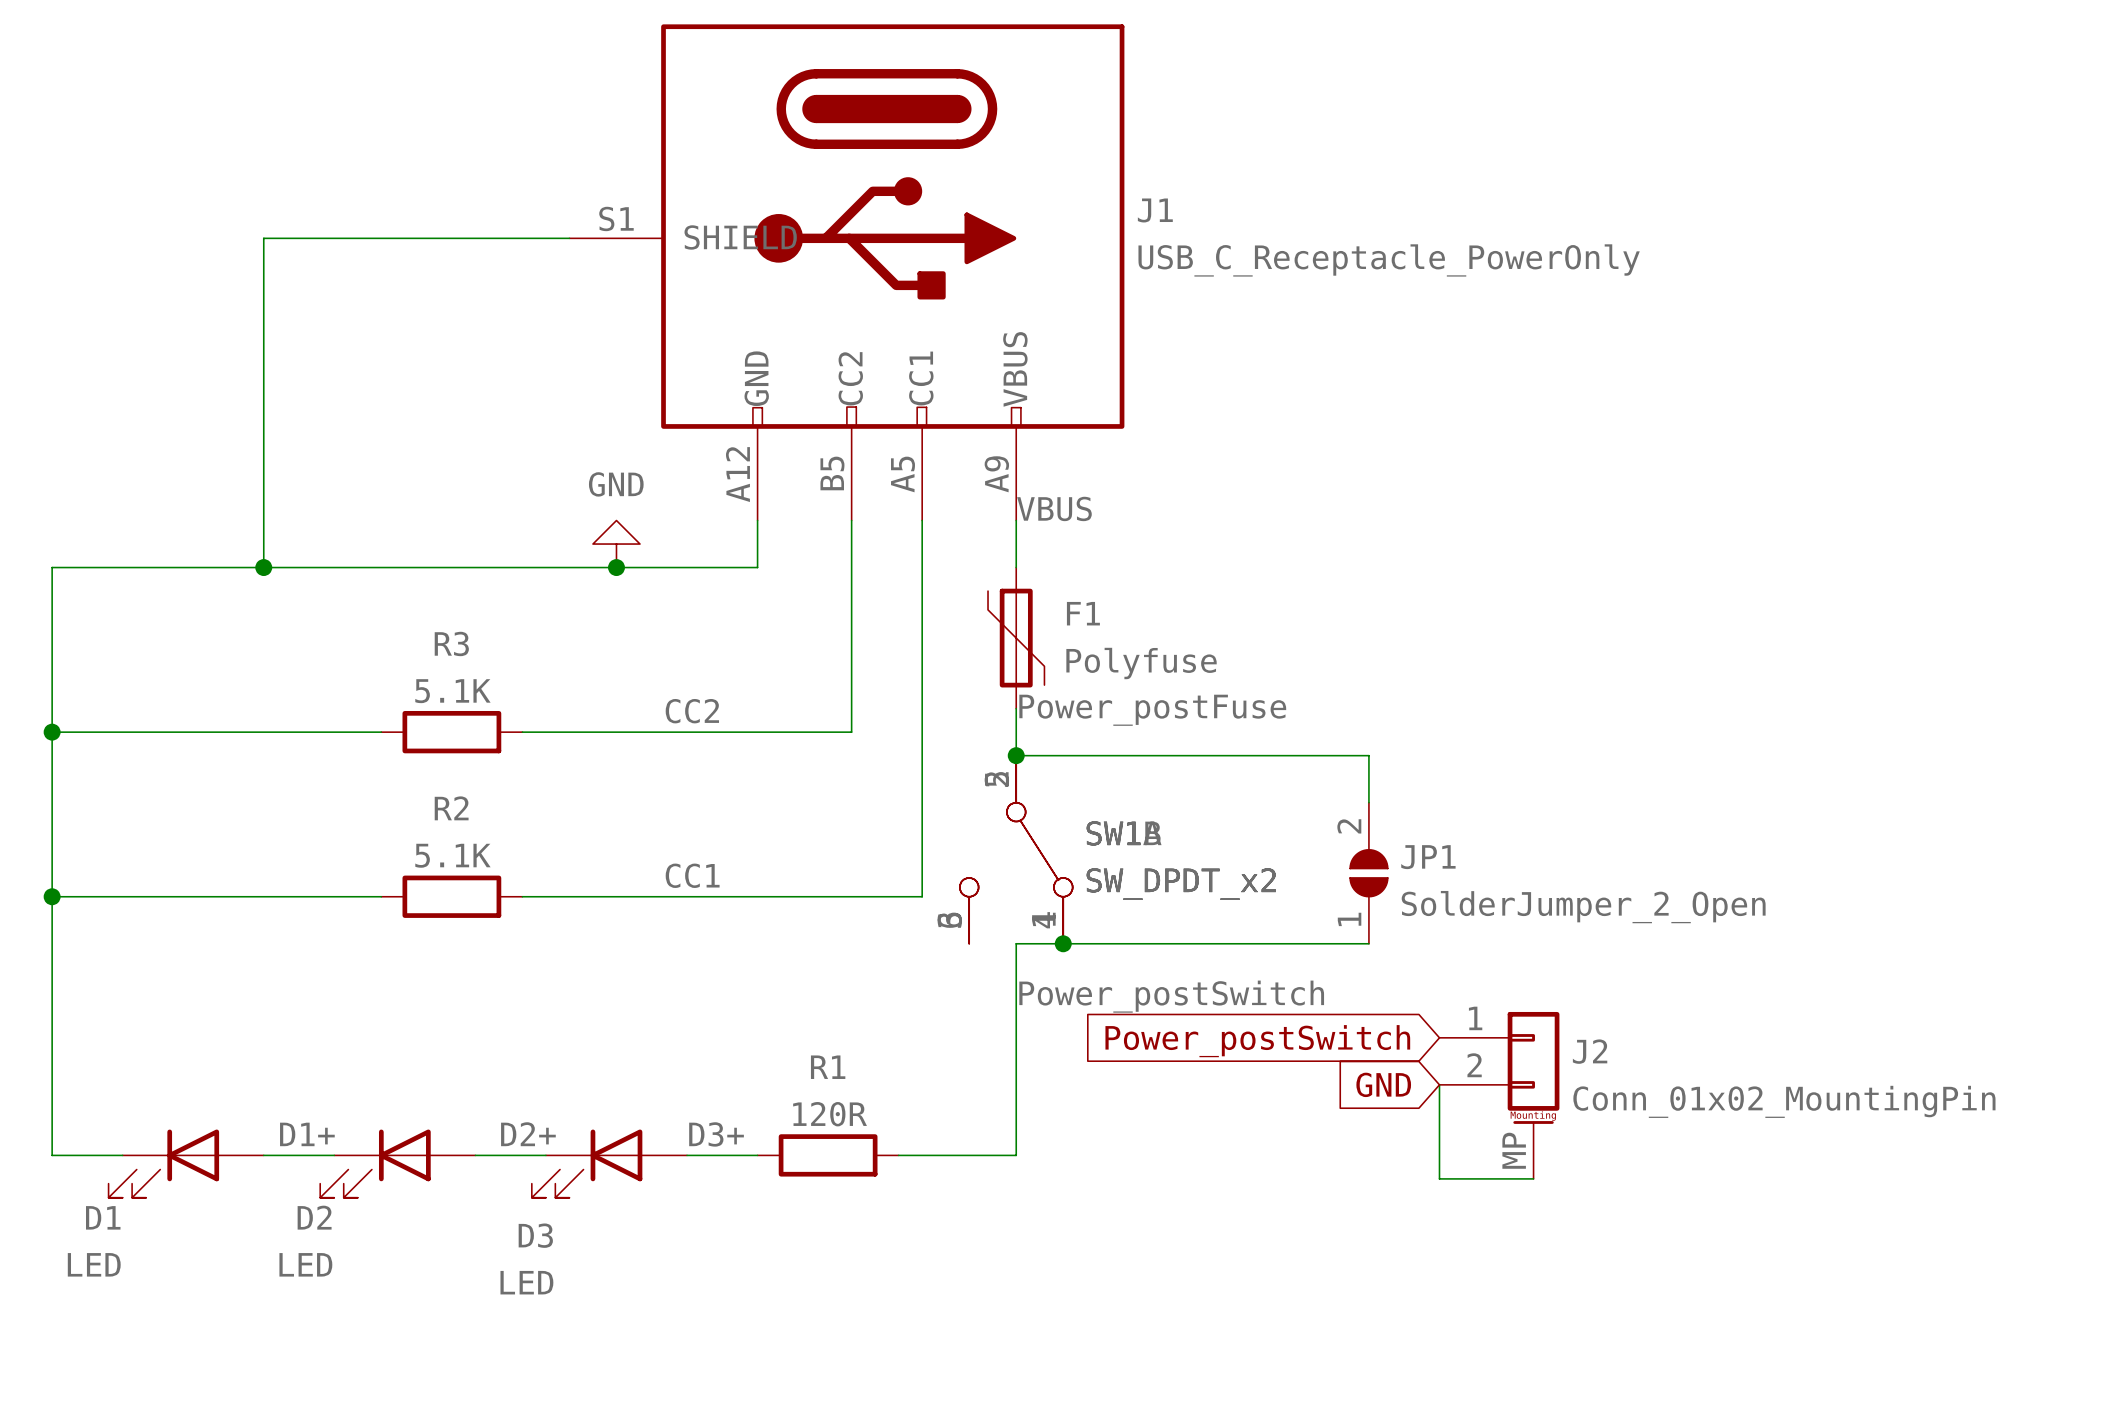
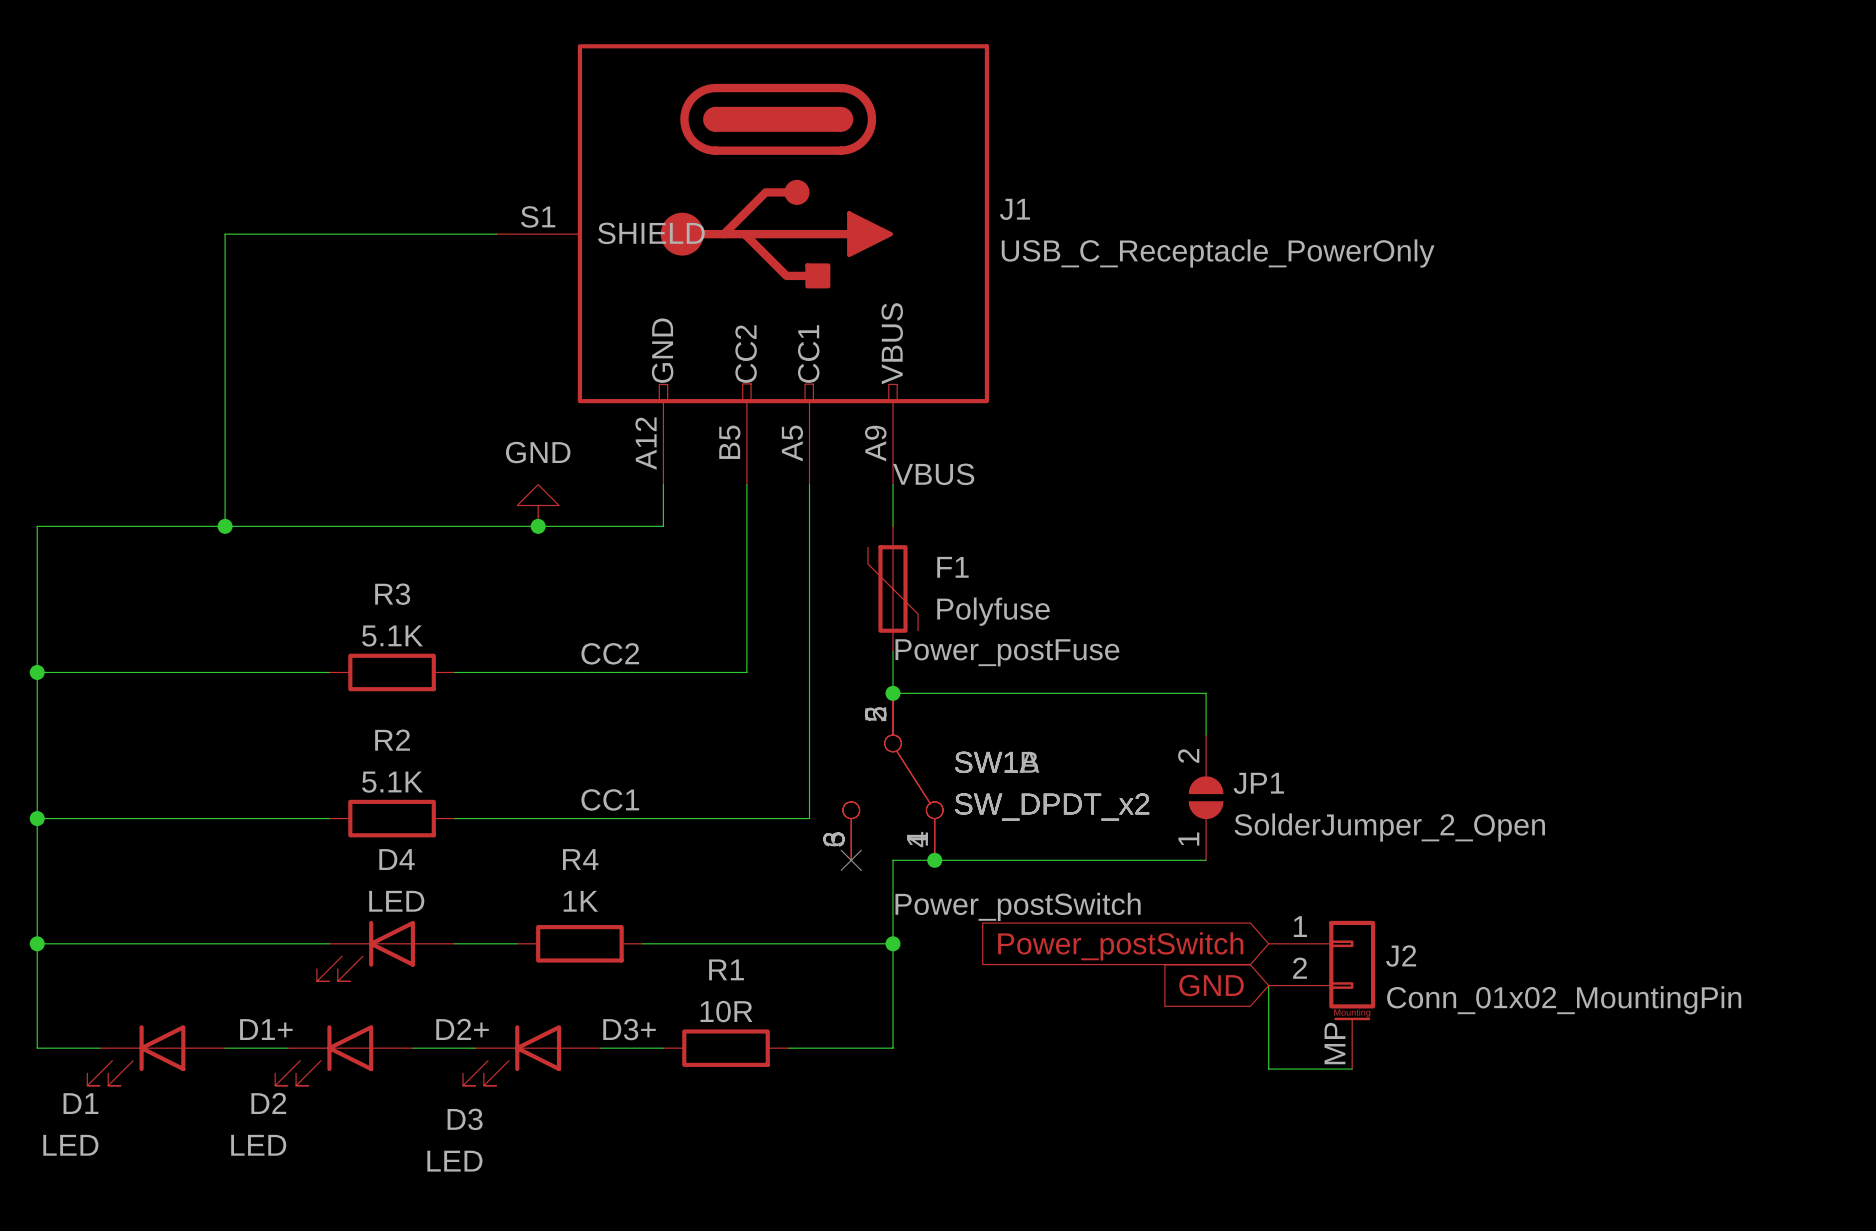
no-connect mark: none -> (851, 860)
wire: none -> (37, 943) (329, 943)
junction: none -> (37, 943)
wire: none -> (454, 943) (517, 943)
R4: none -> 1K (579, 943)
wire: none -> (642, 943) (892, 943)
junction: none -> (892, 943)
D4: none -> LED (385, 951)
R1 value: 120R (830, 1114) -> 10R (726, 1011)

